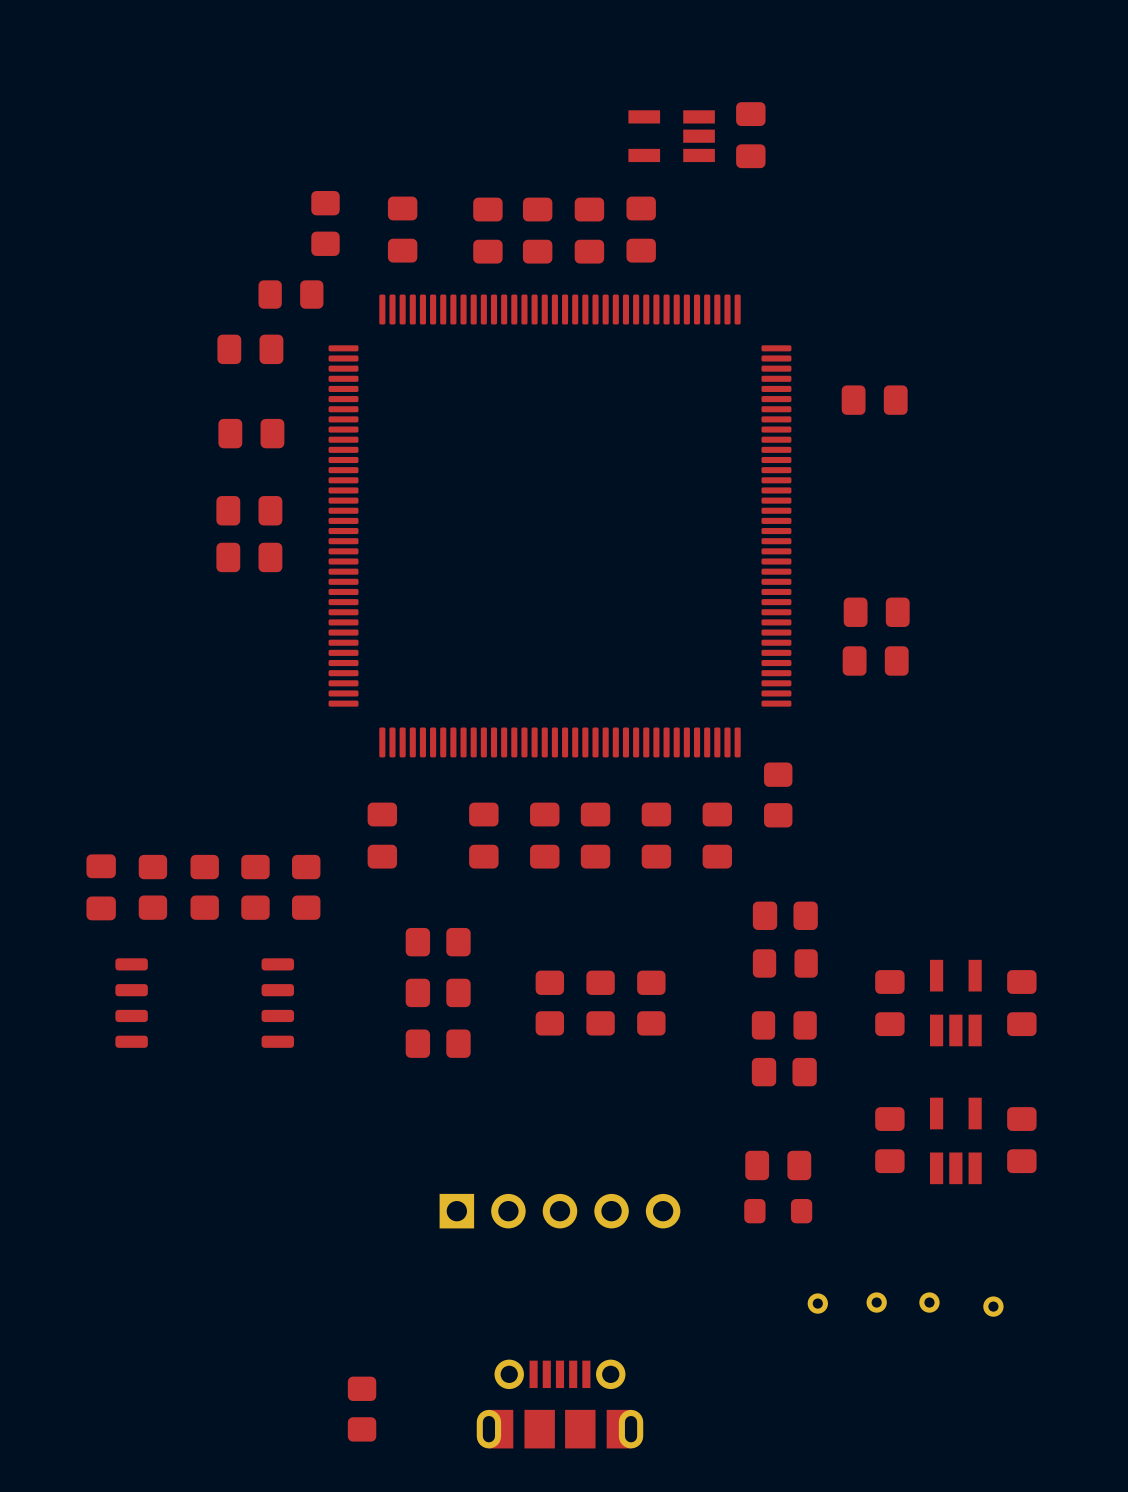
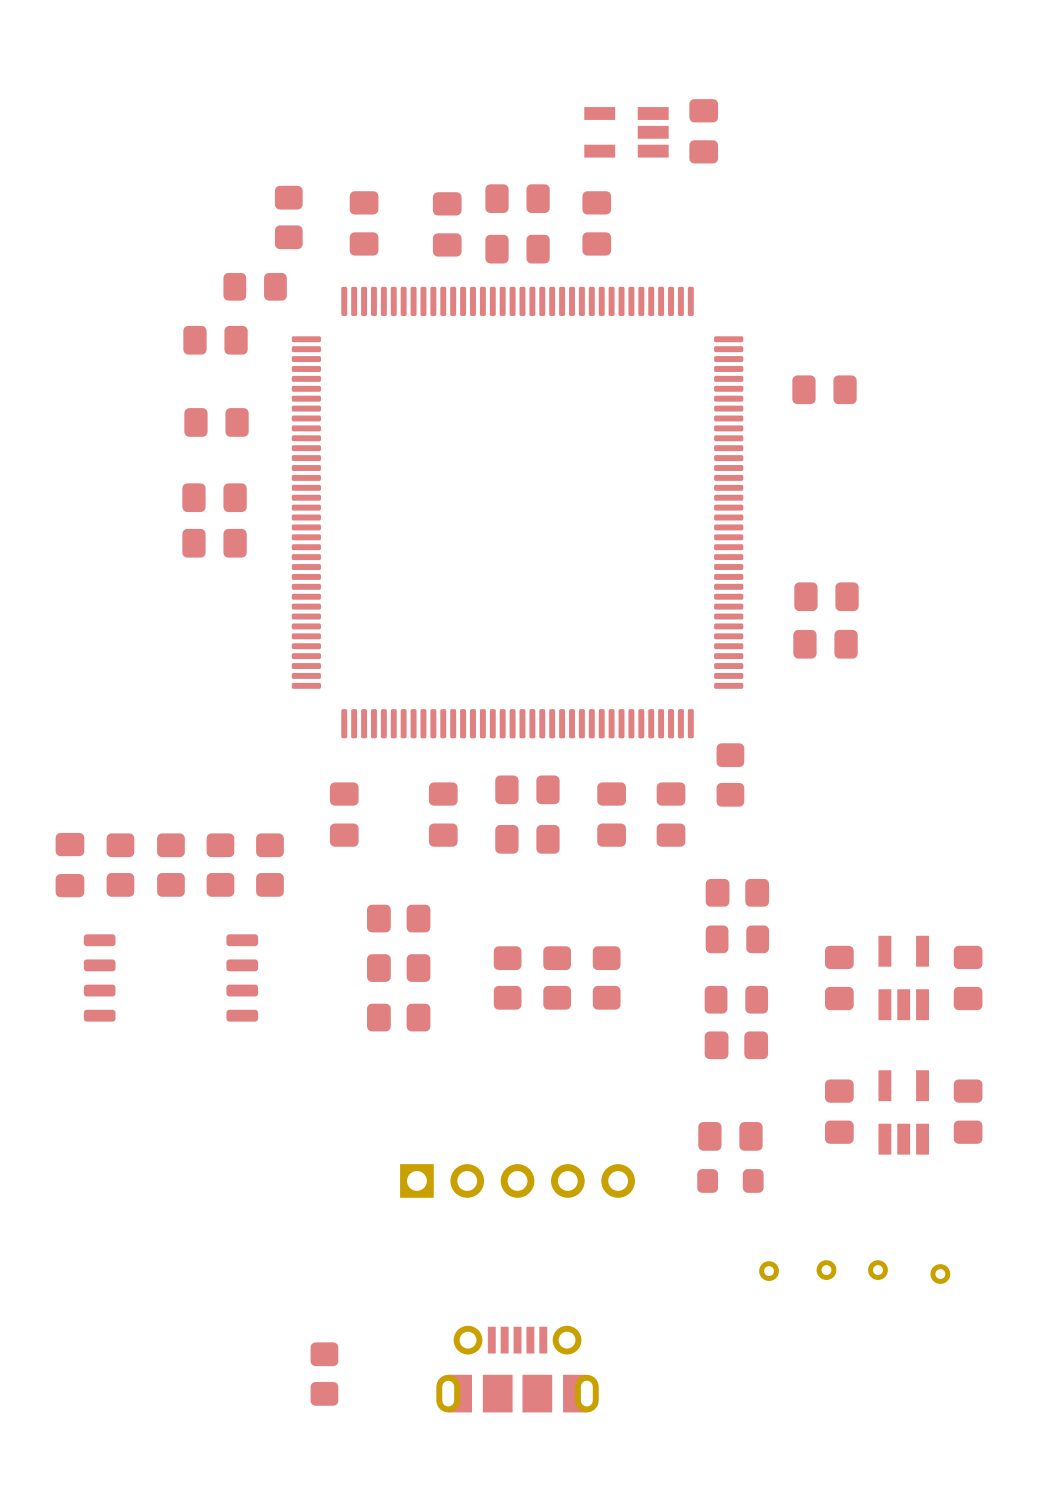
part: none -> (517, 198)
part: (537, 230) -> none
part: (589, 230) -> none
part: none -> (517, 249)
part: none -> (527, 789)
part: (544, 835) -> none
part: (595, 835) -> none
part: none -> (527, 839)

